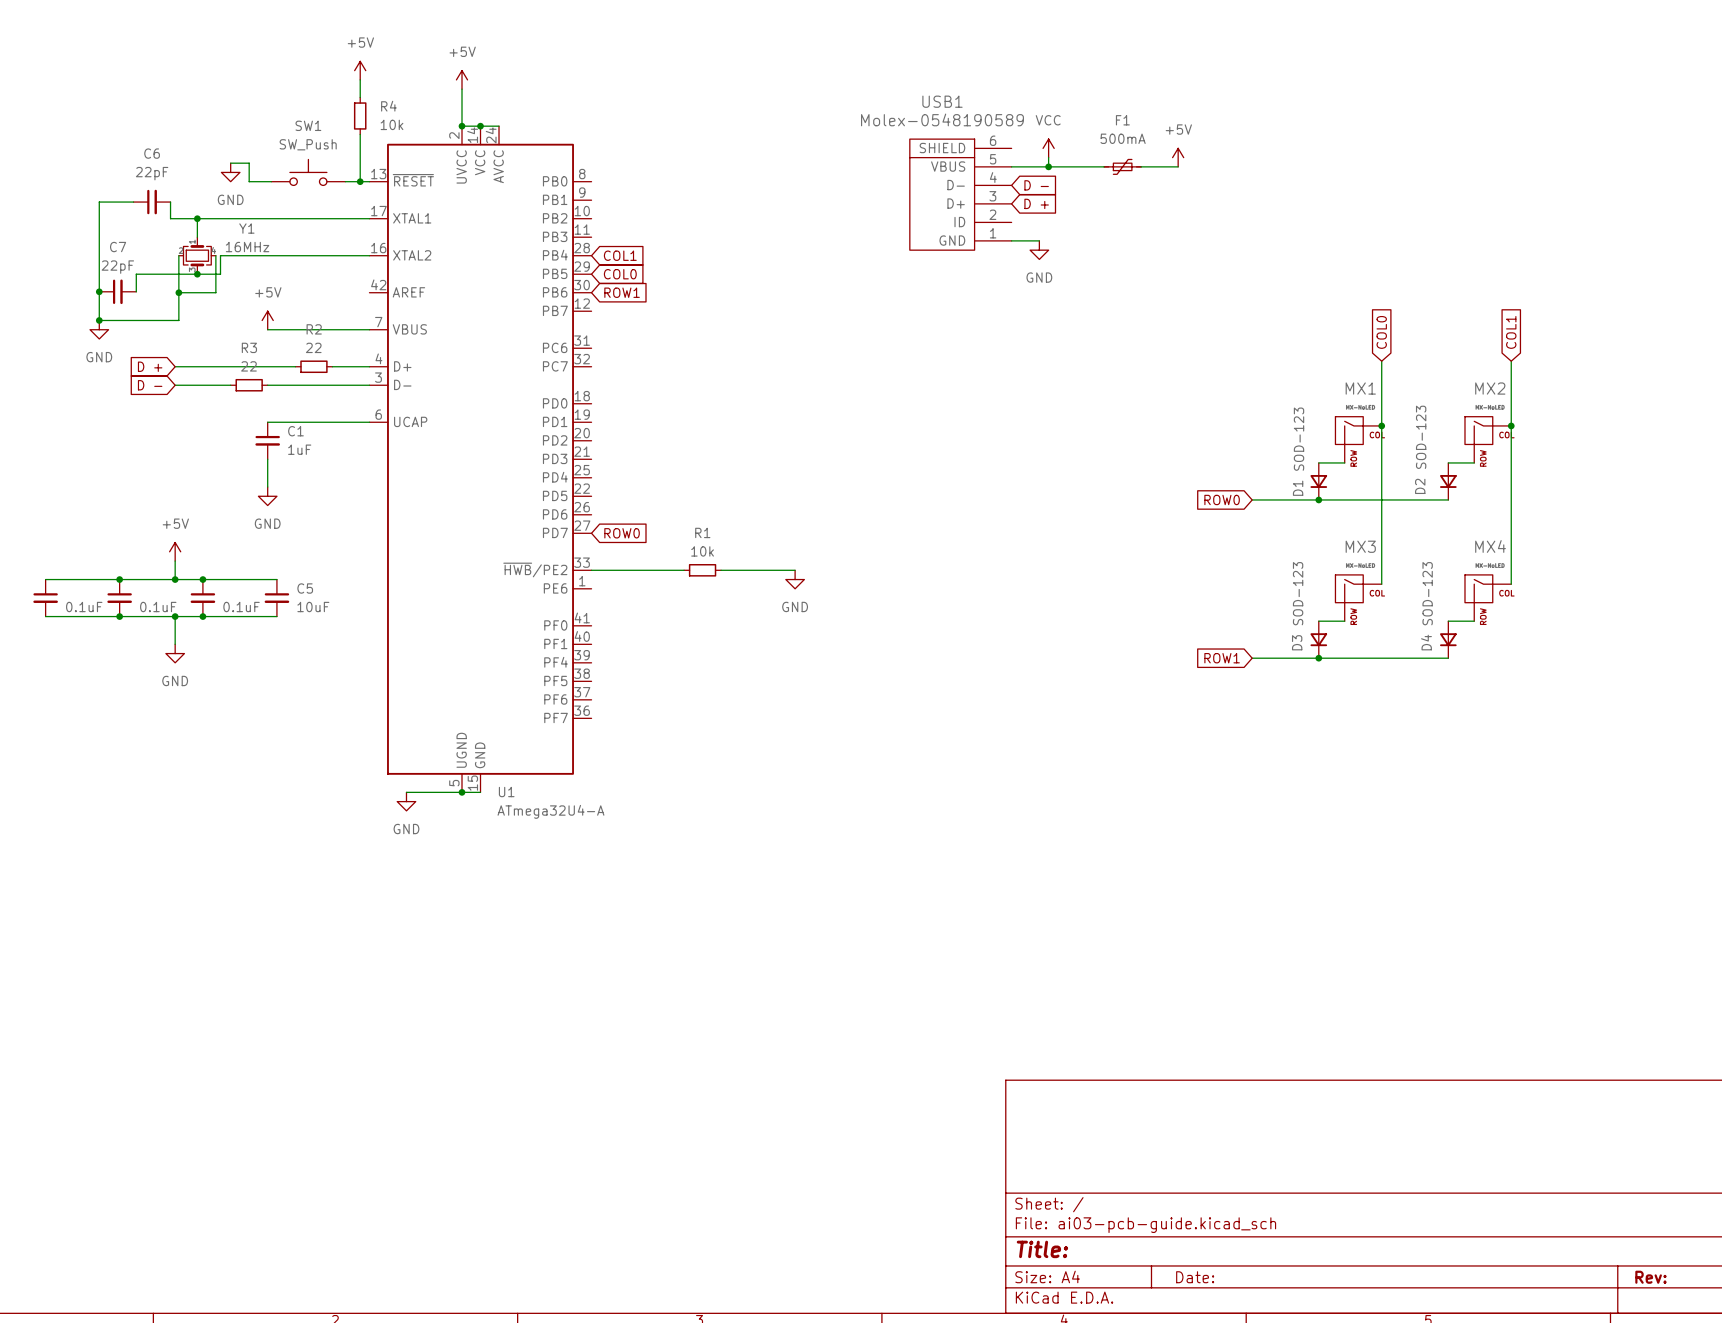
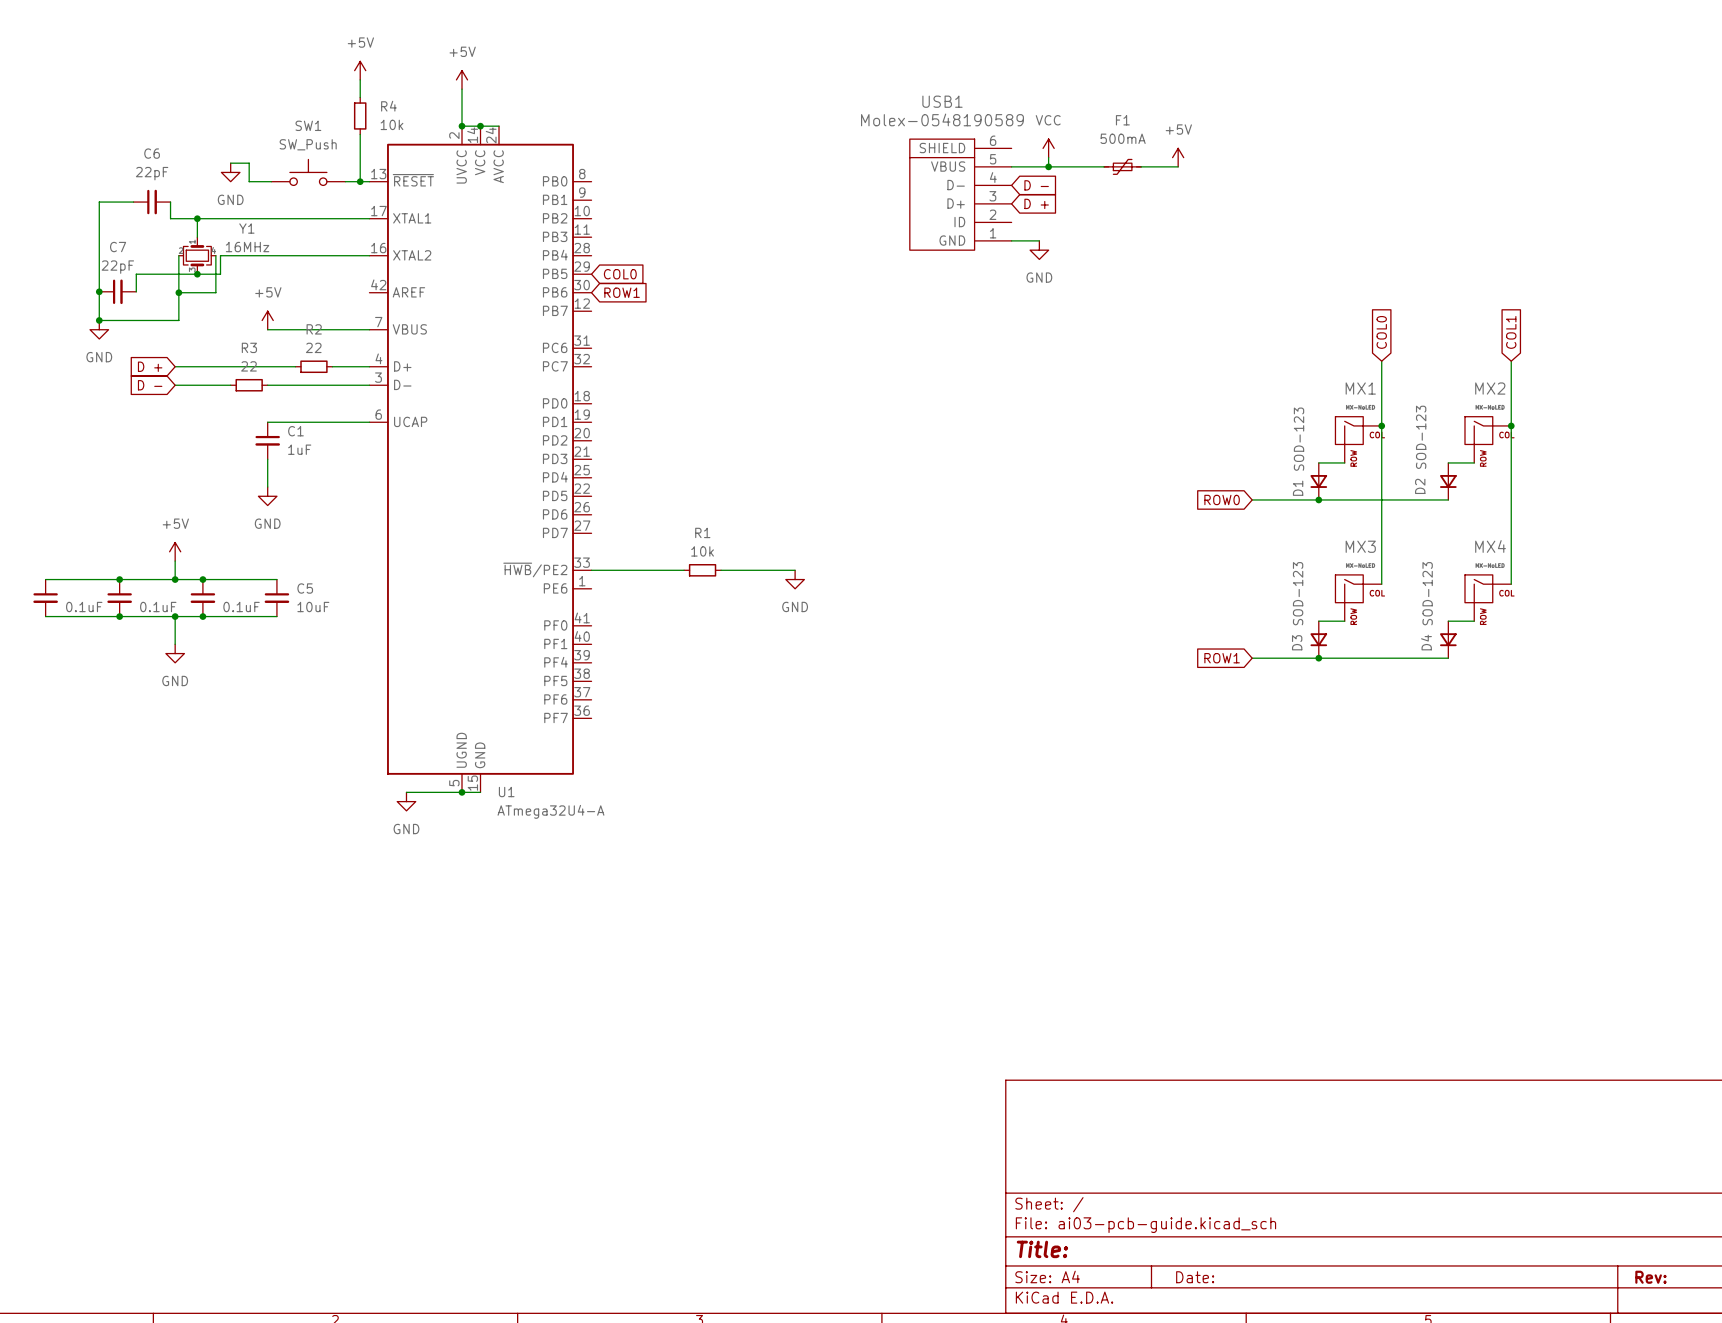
global label: COL1 (620, 255) -> none
global label: ROW0 (622, 533) -> none

